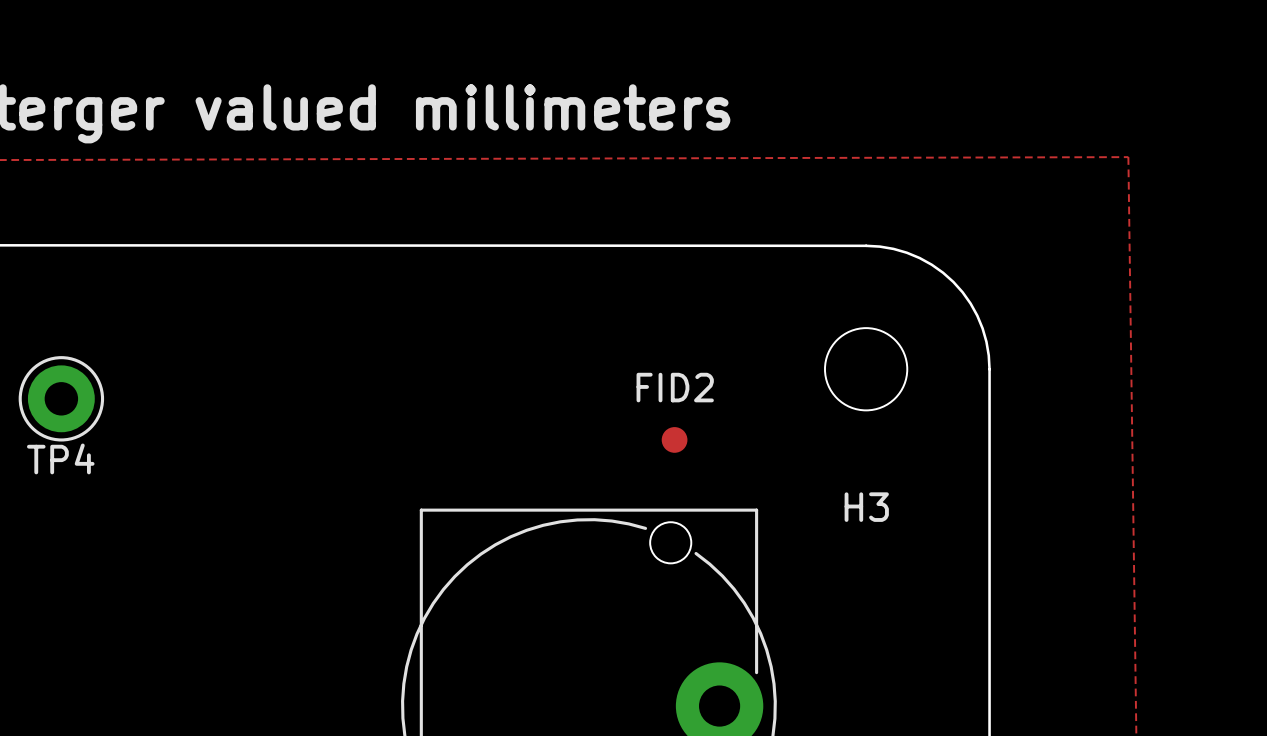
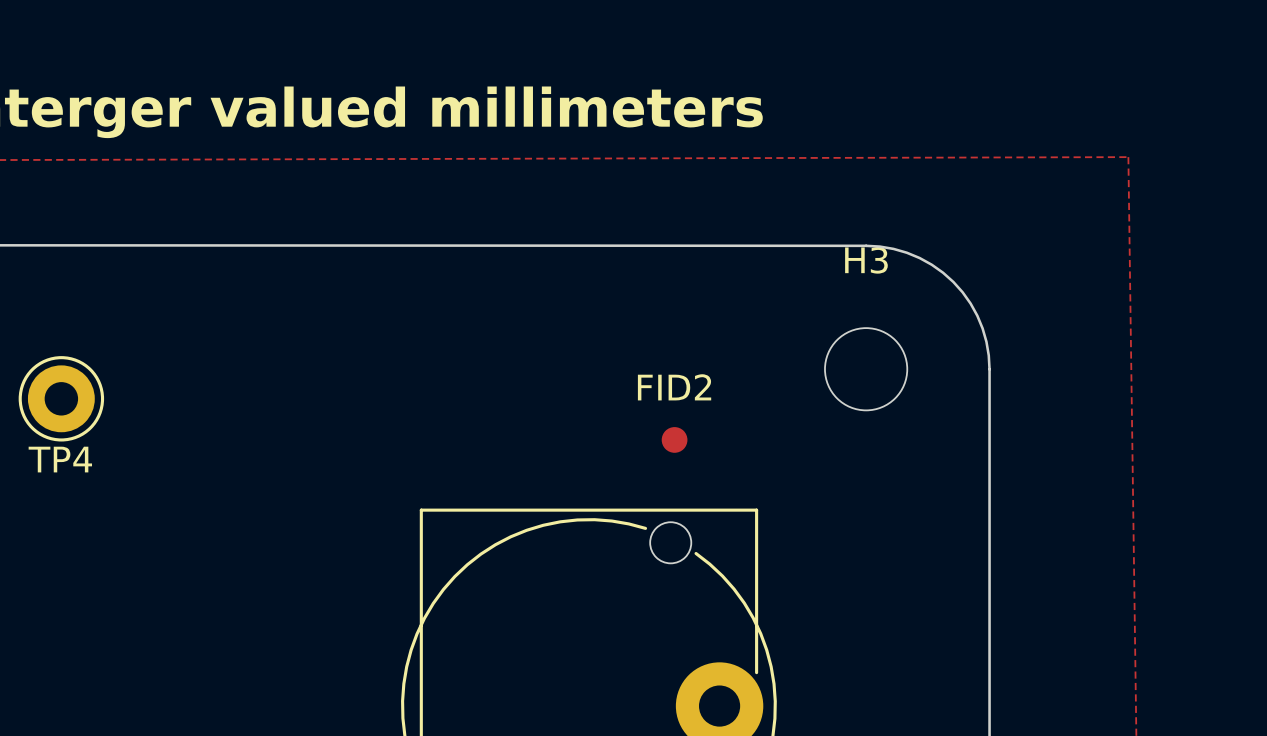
H3 name position: H3 (866, 507) -> H3 (866, 260)

